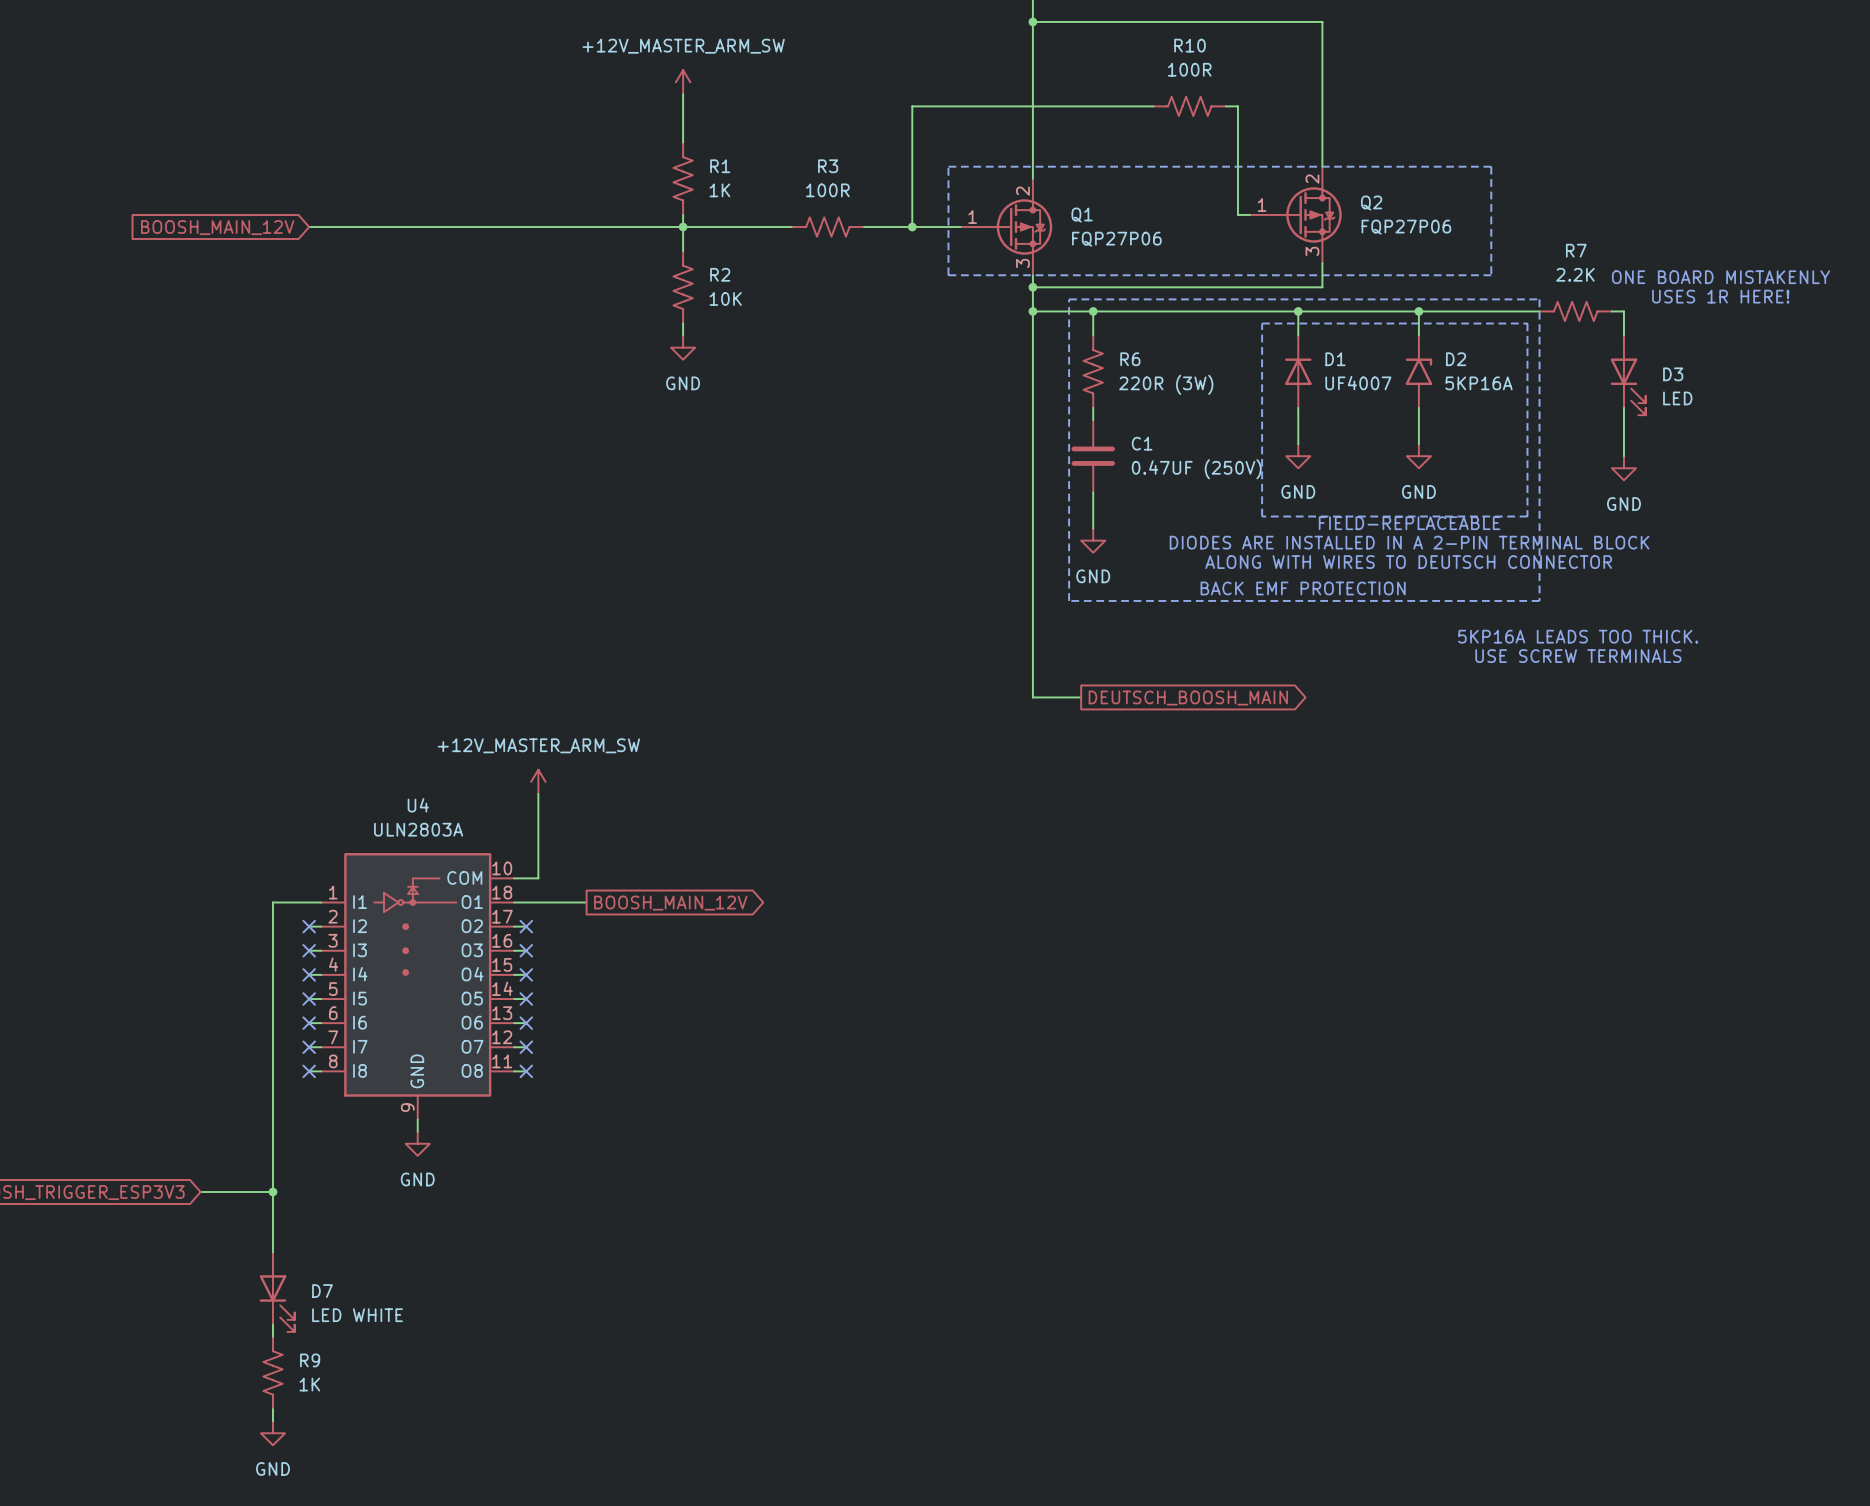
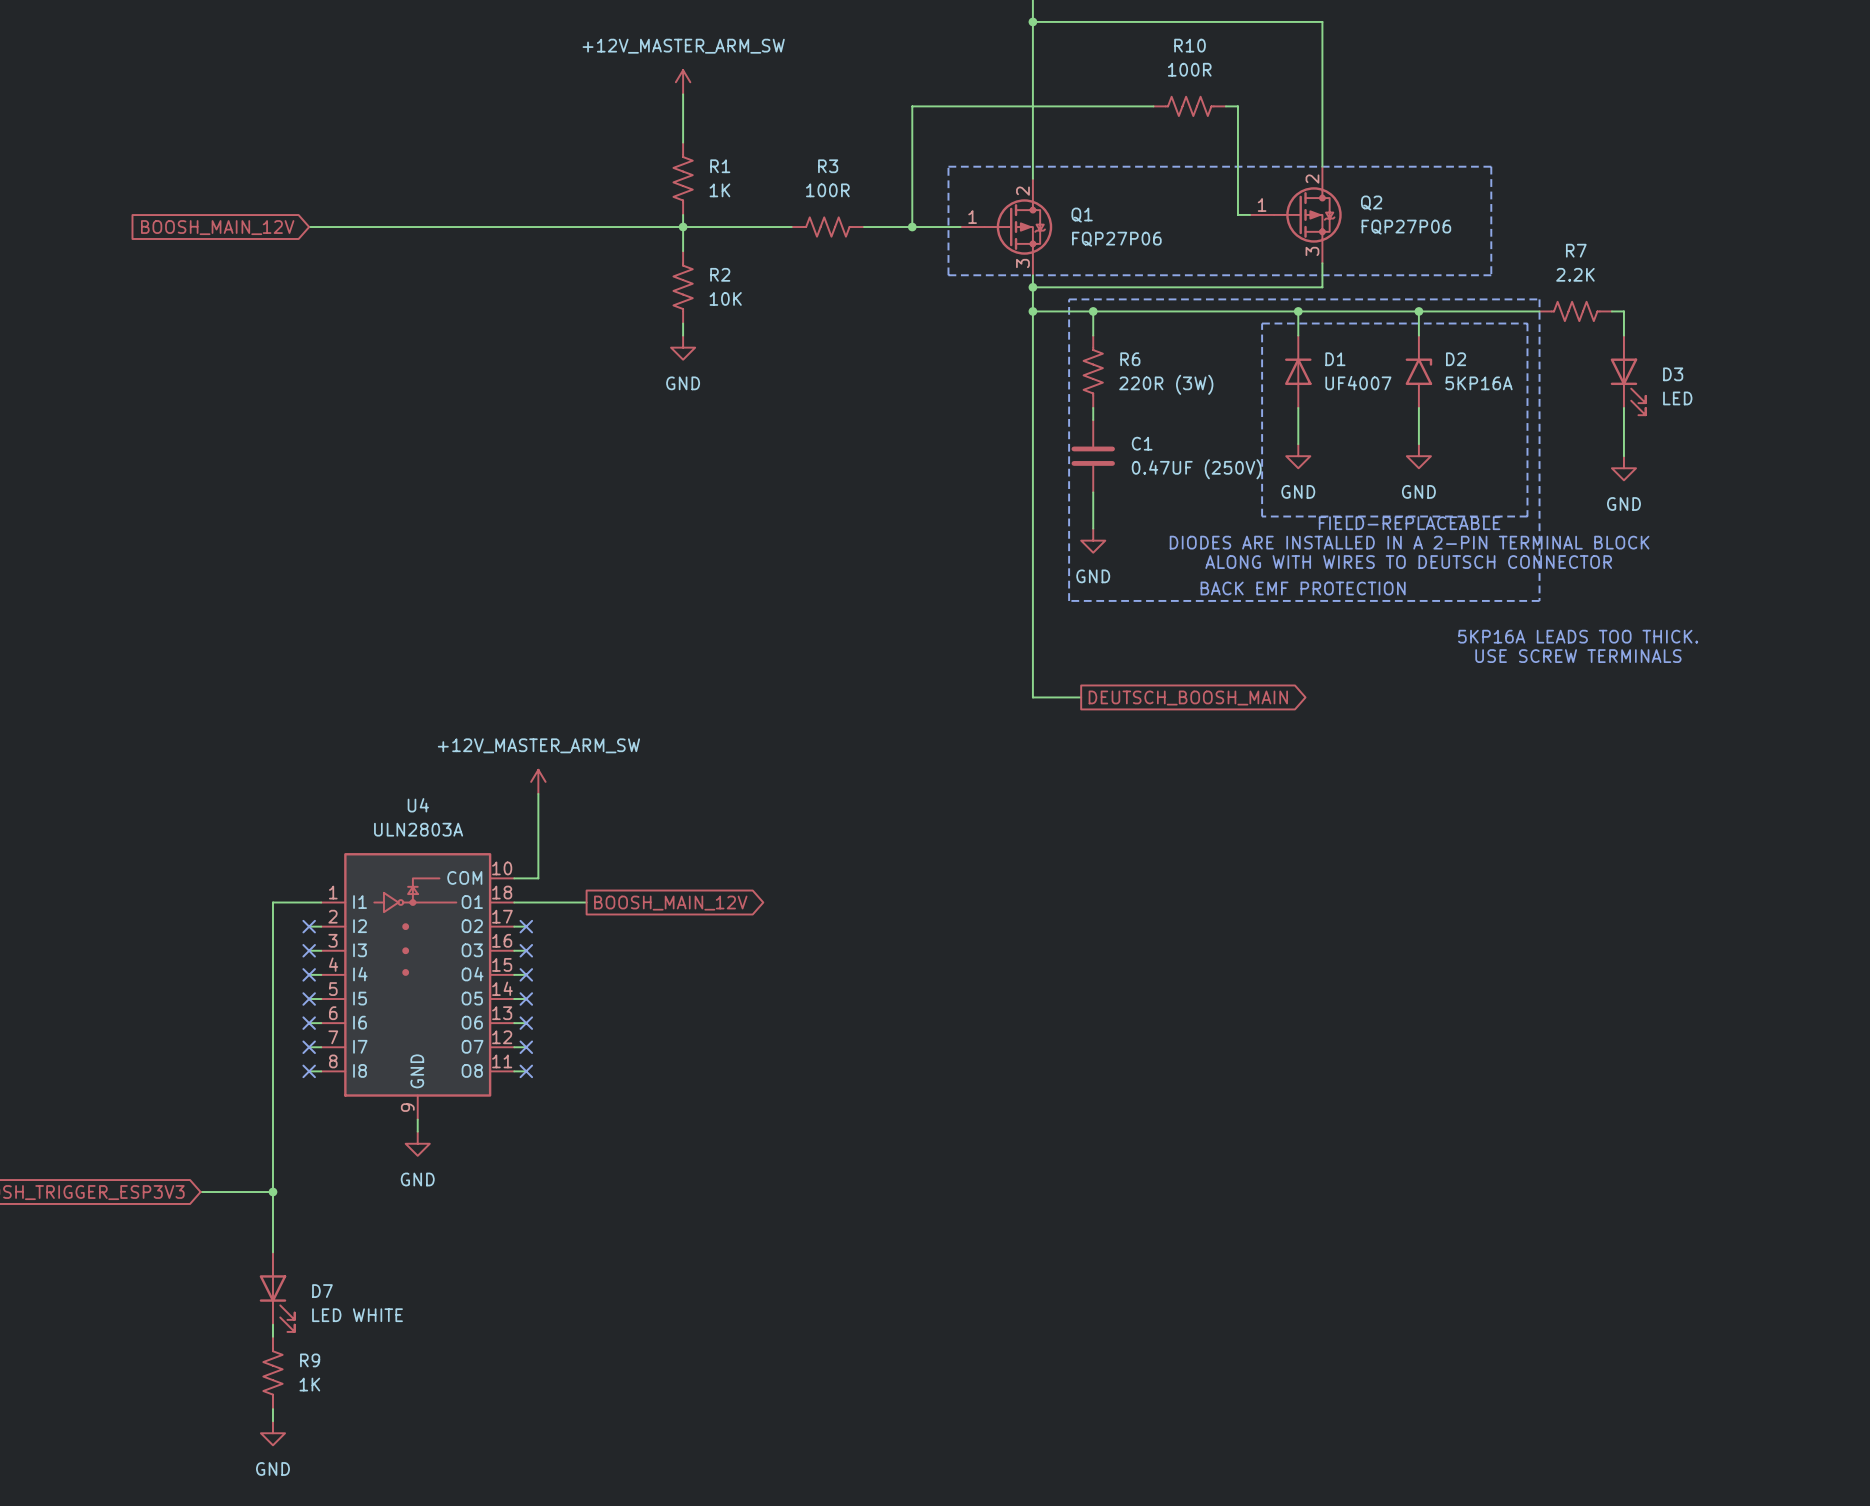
text: ONE BOARD MISTAKENLY (1721, 277) -> none
text: USES 1R HERE! (1720, 296) -> none

